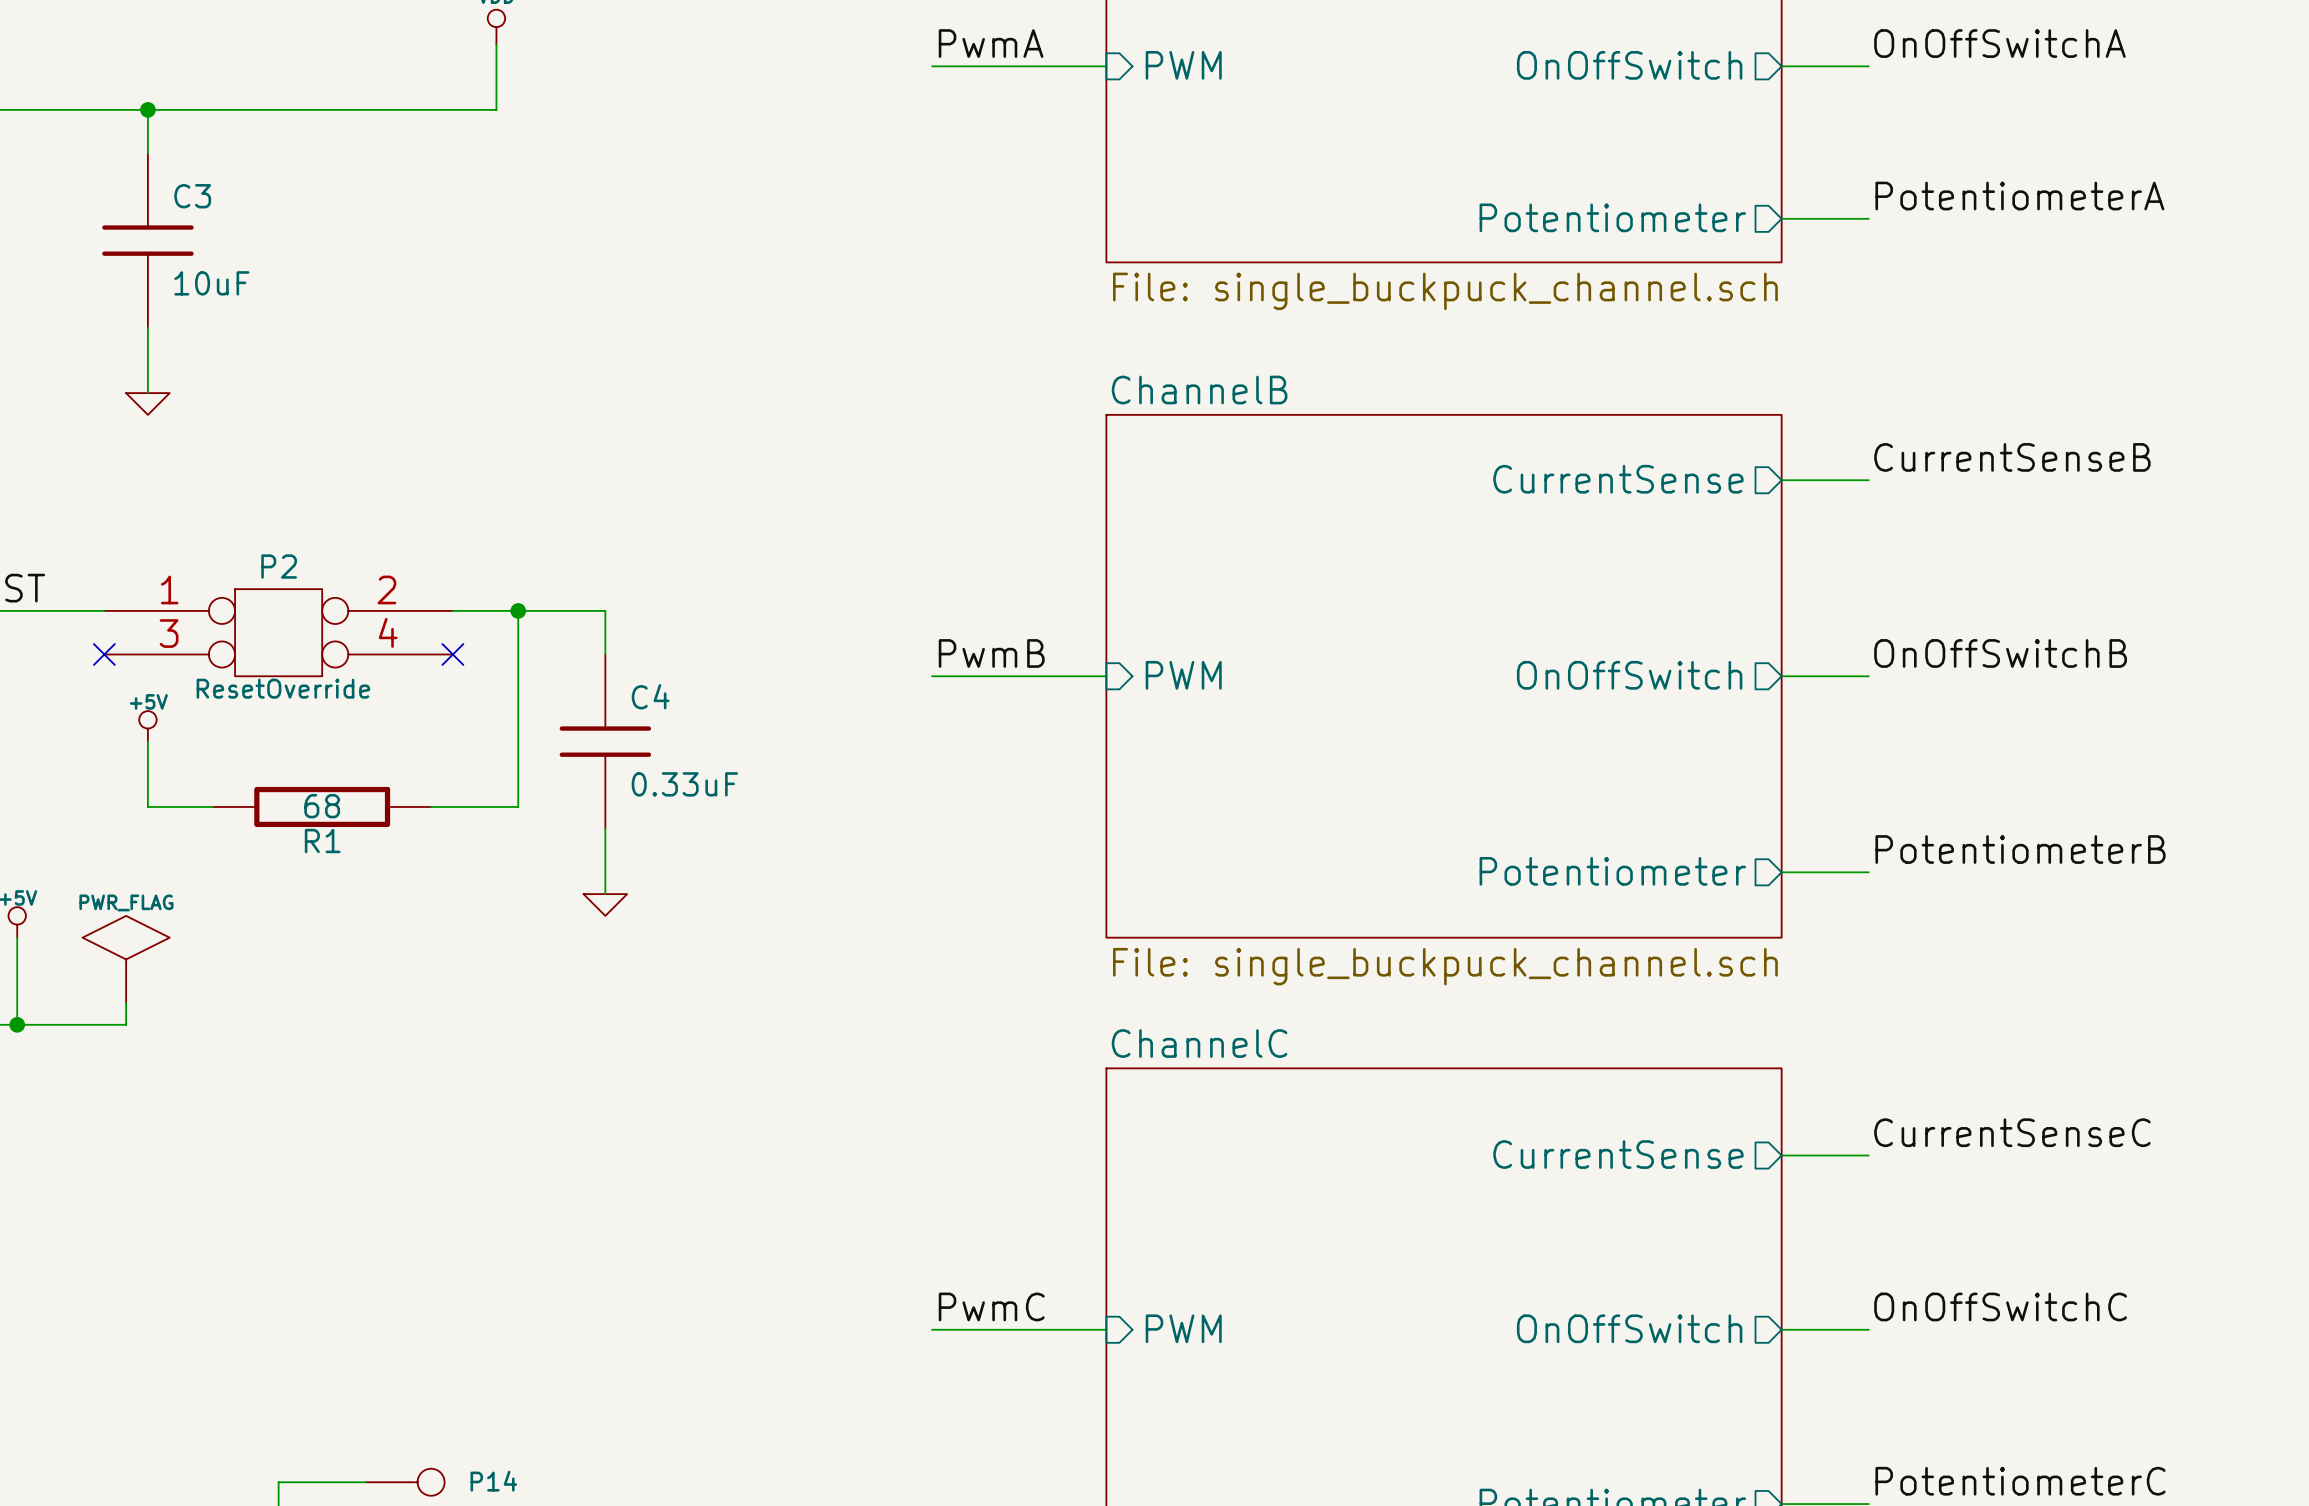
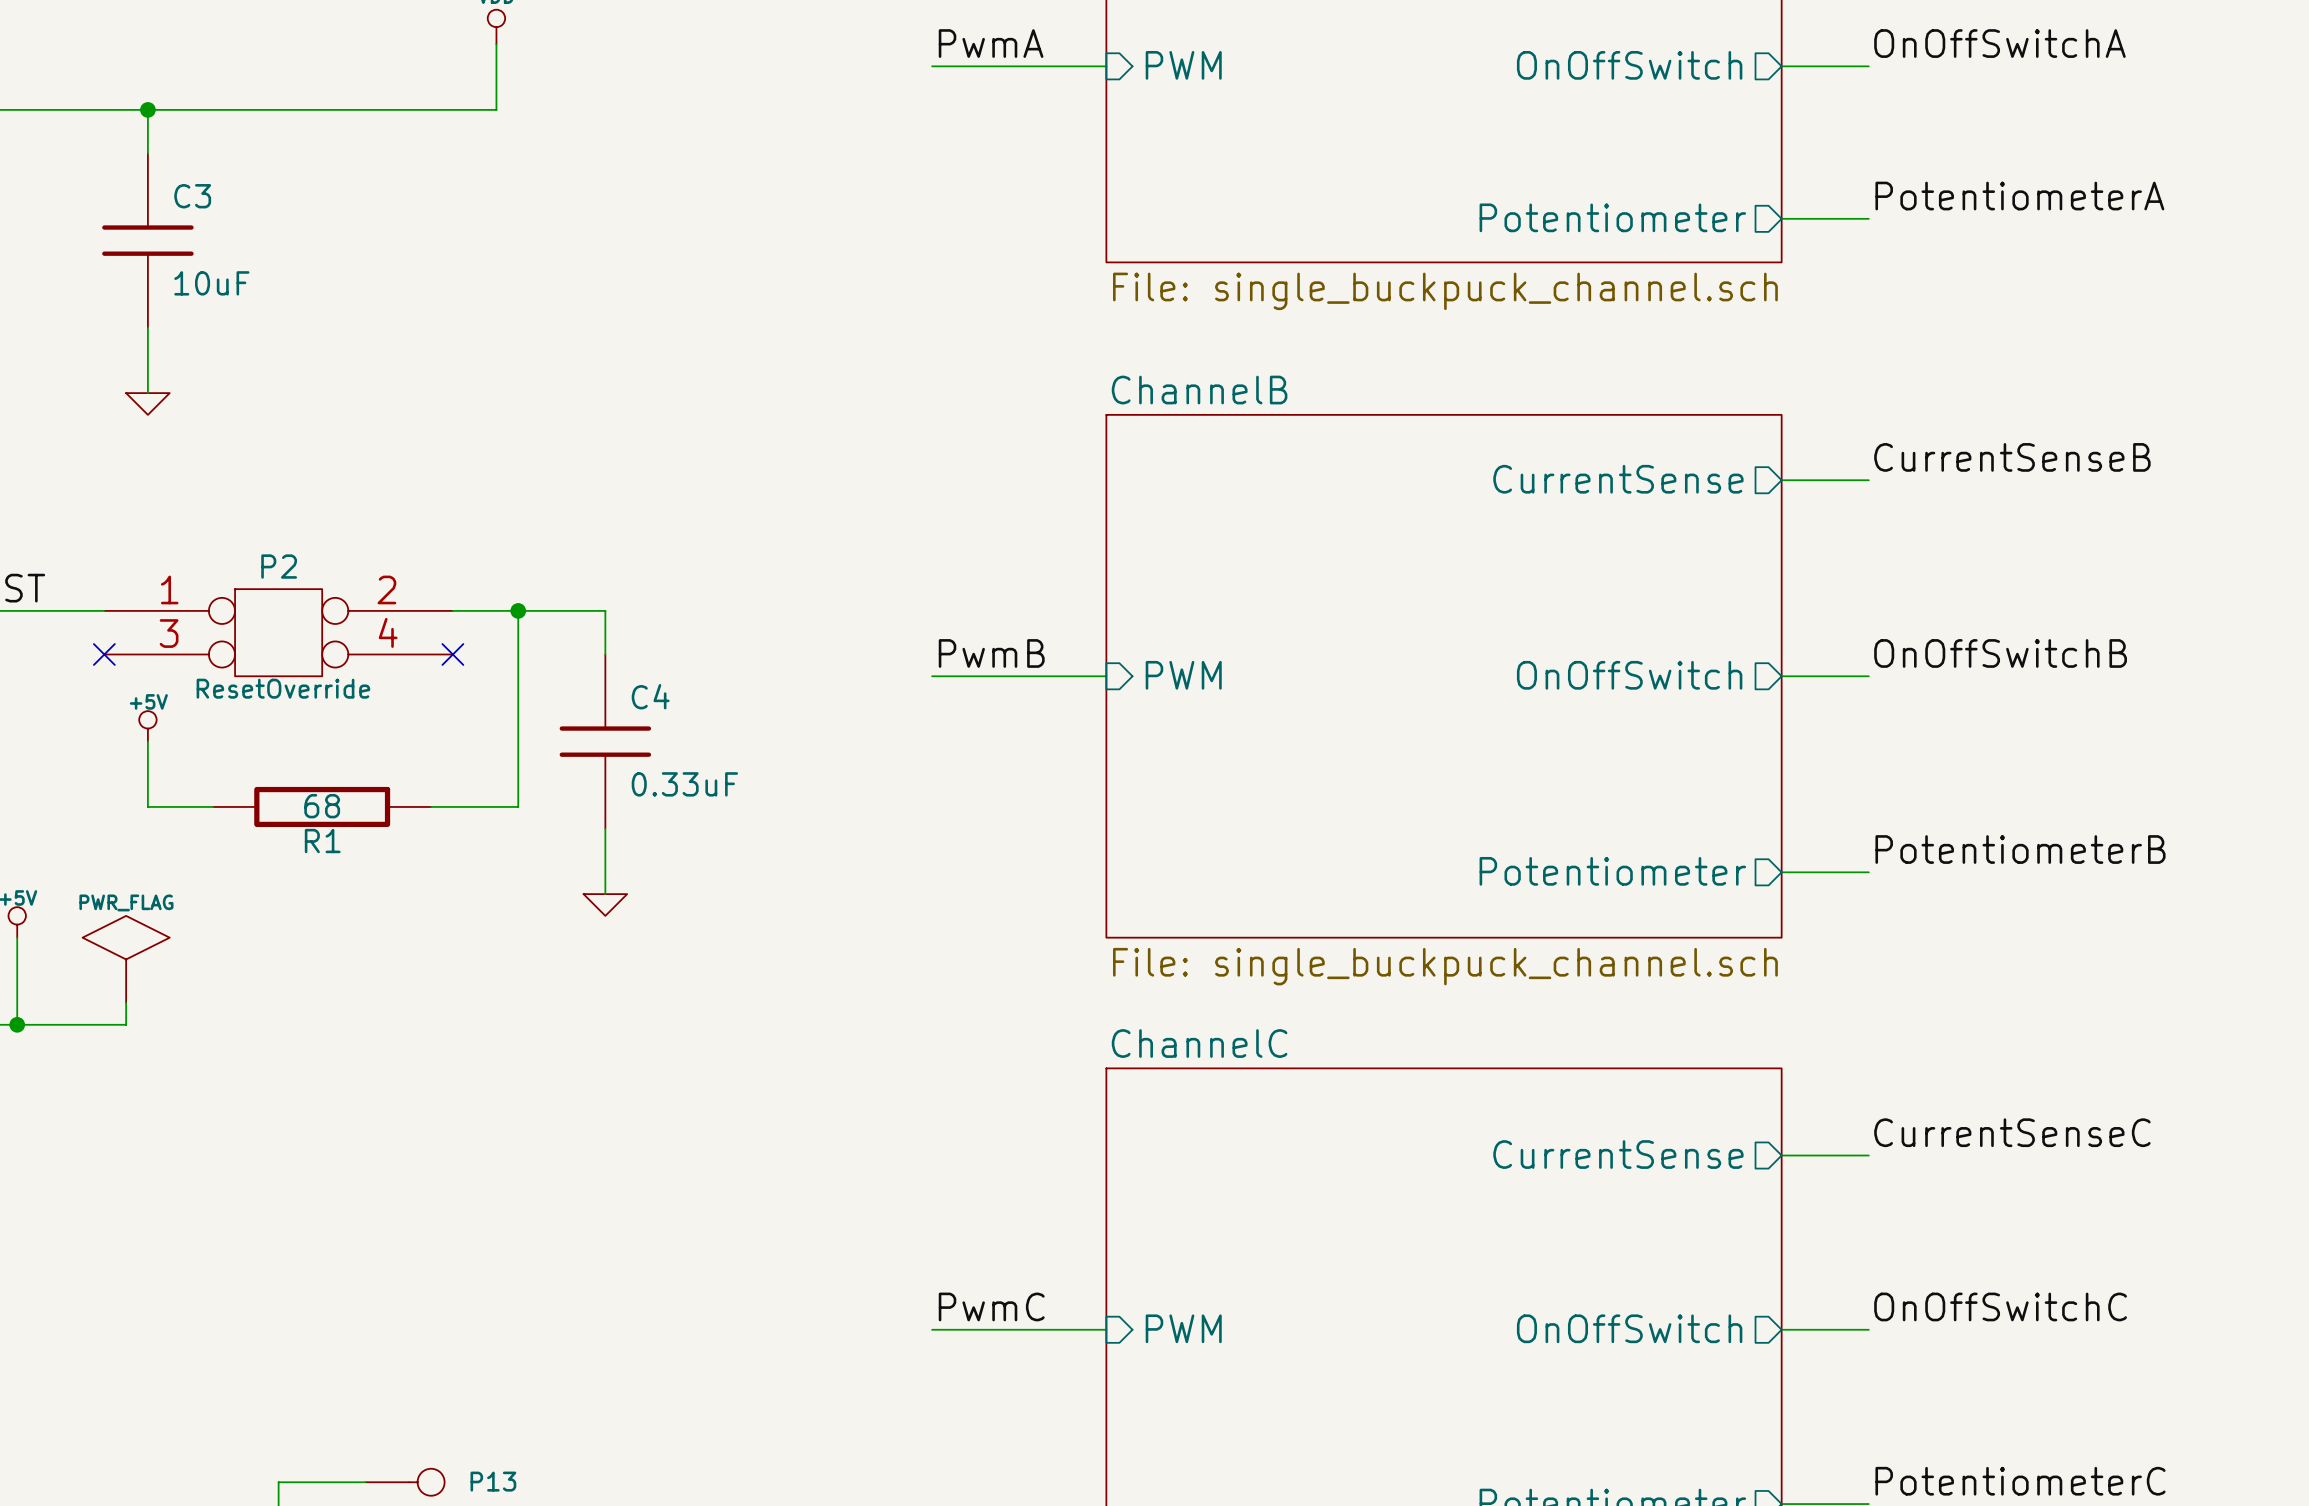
P14 name: P14 (493, 1481) -> P13 (493, 1481)

